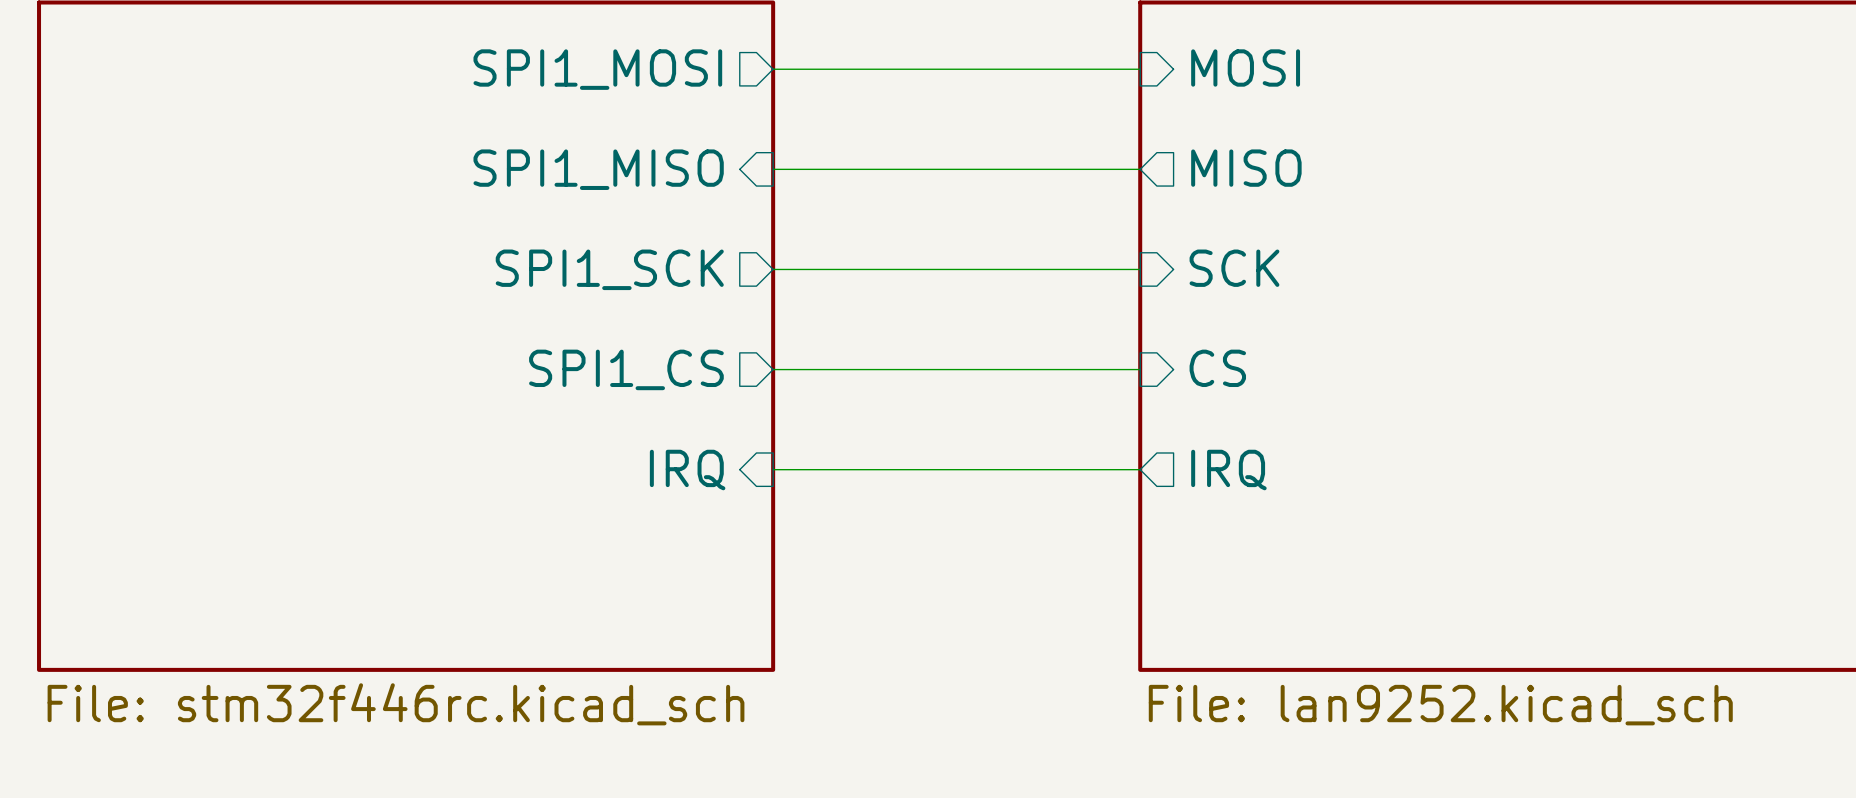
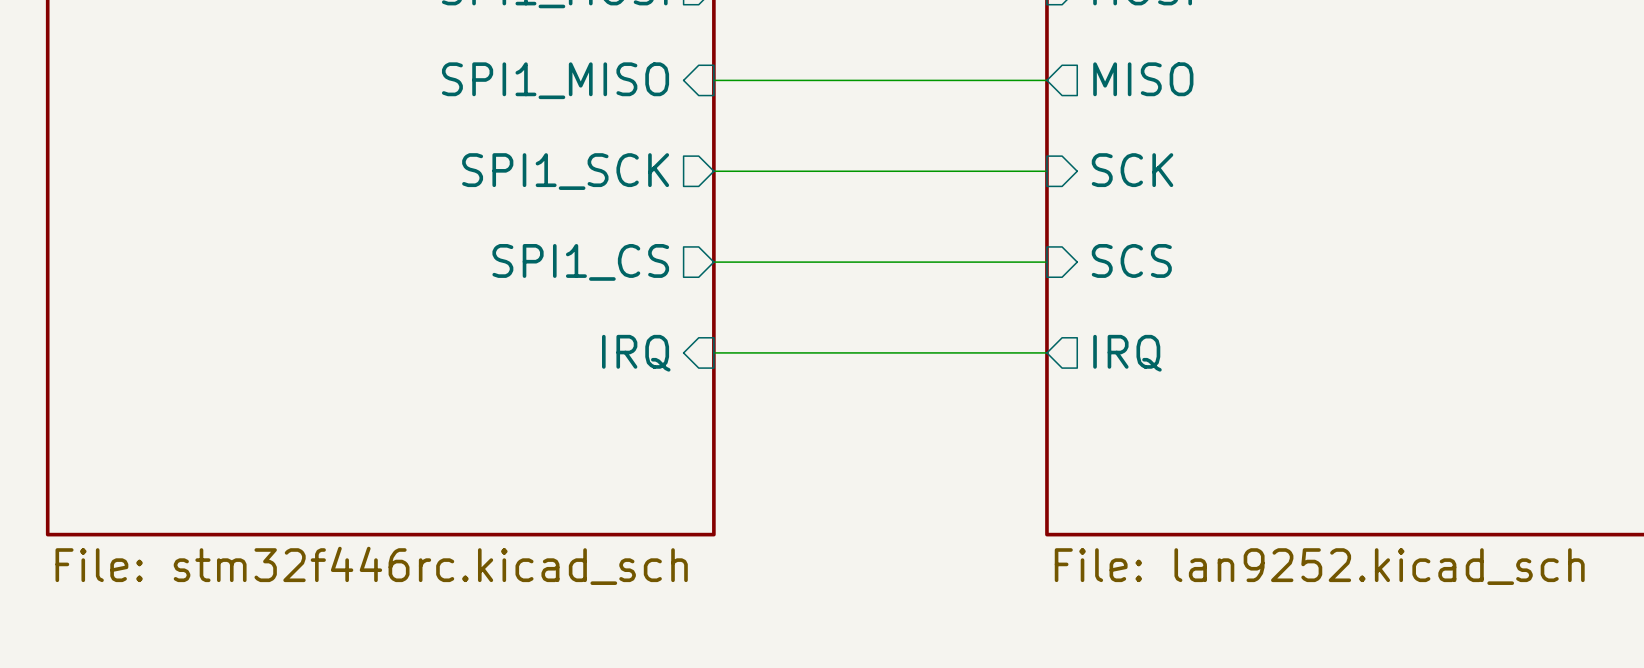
sheet pin: CS (1217, 368) -> SCS (1131, 260)

